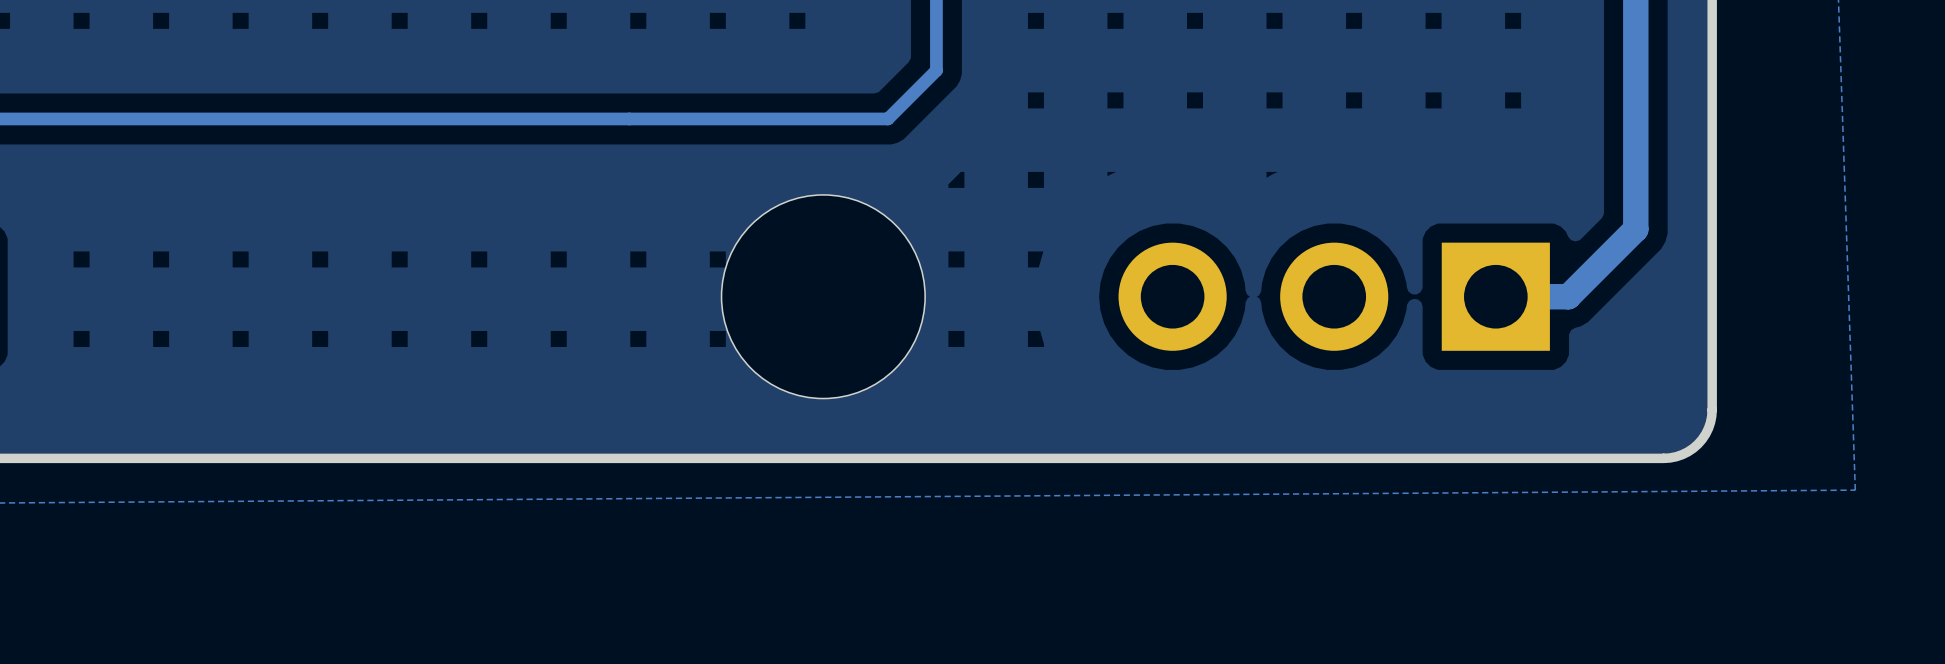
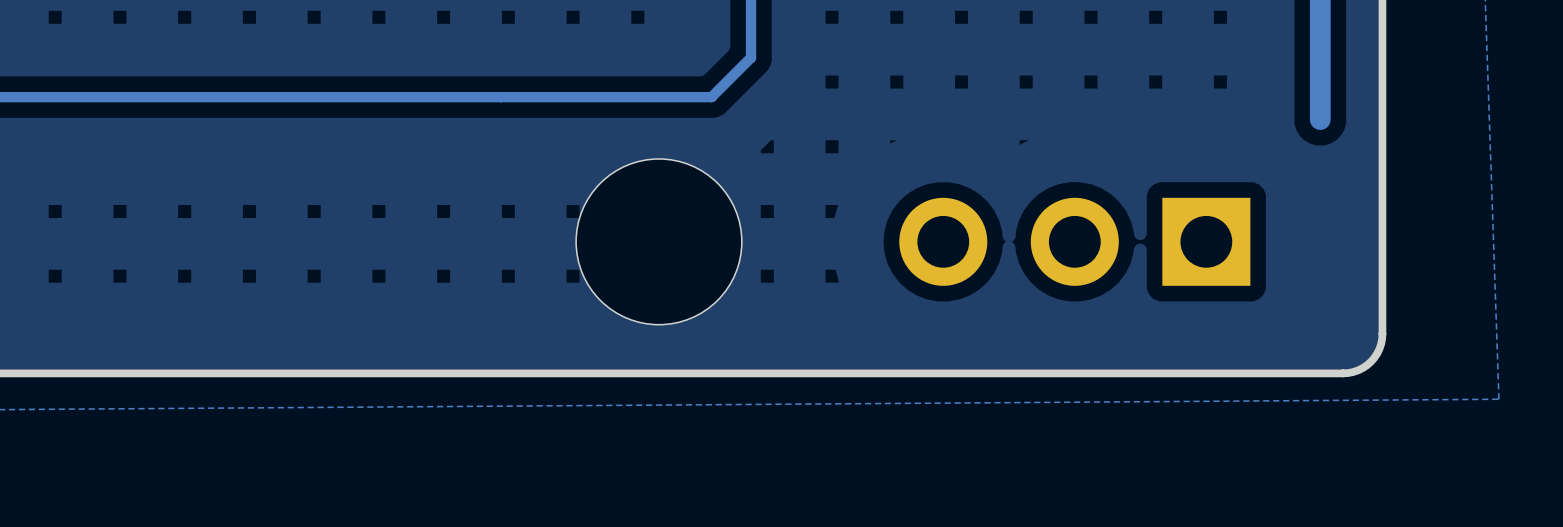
track: (1635, 146) (1635, 229) (1568, 296) (1495, 296) -> none

